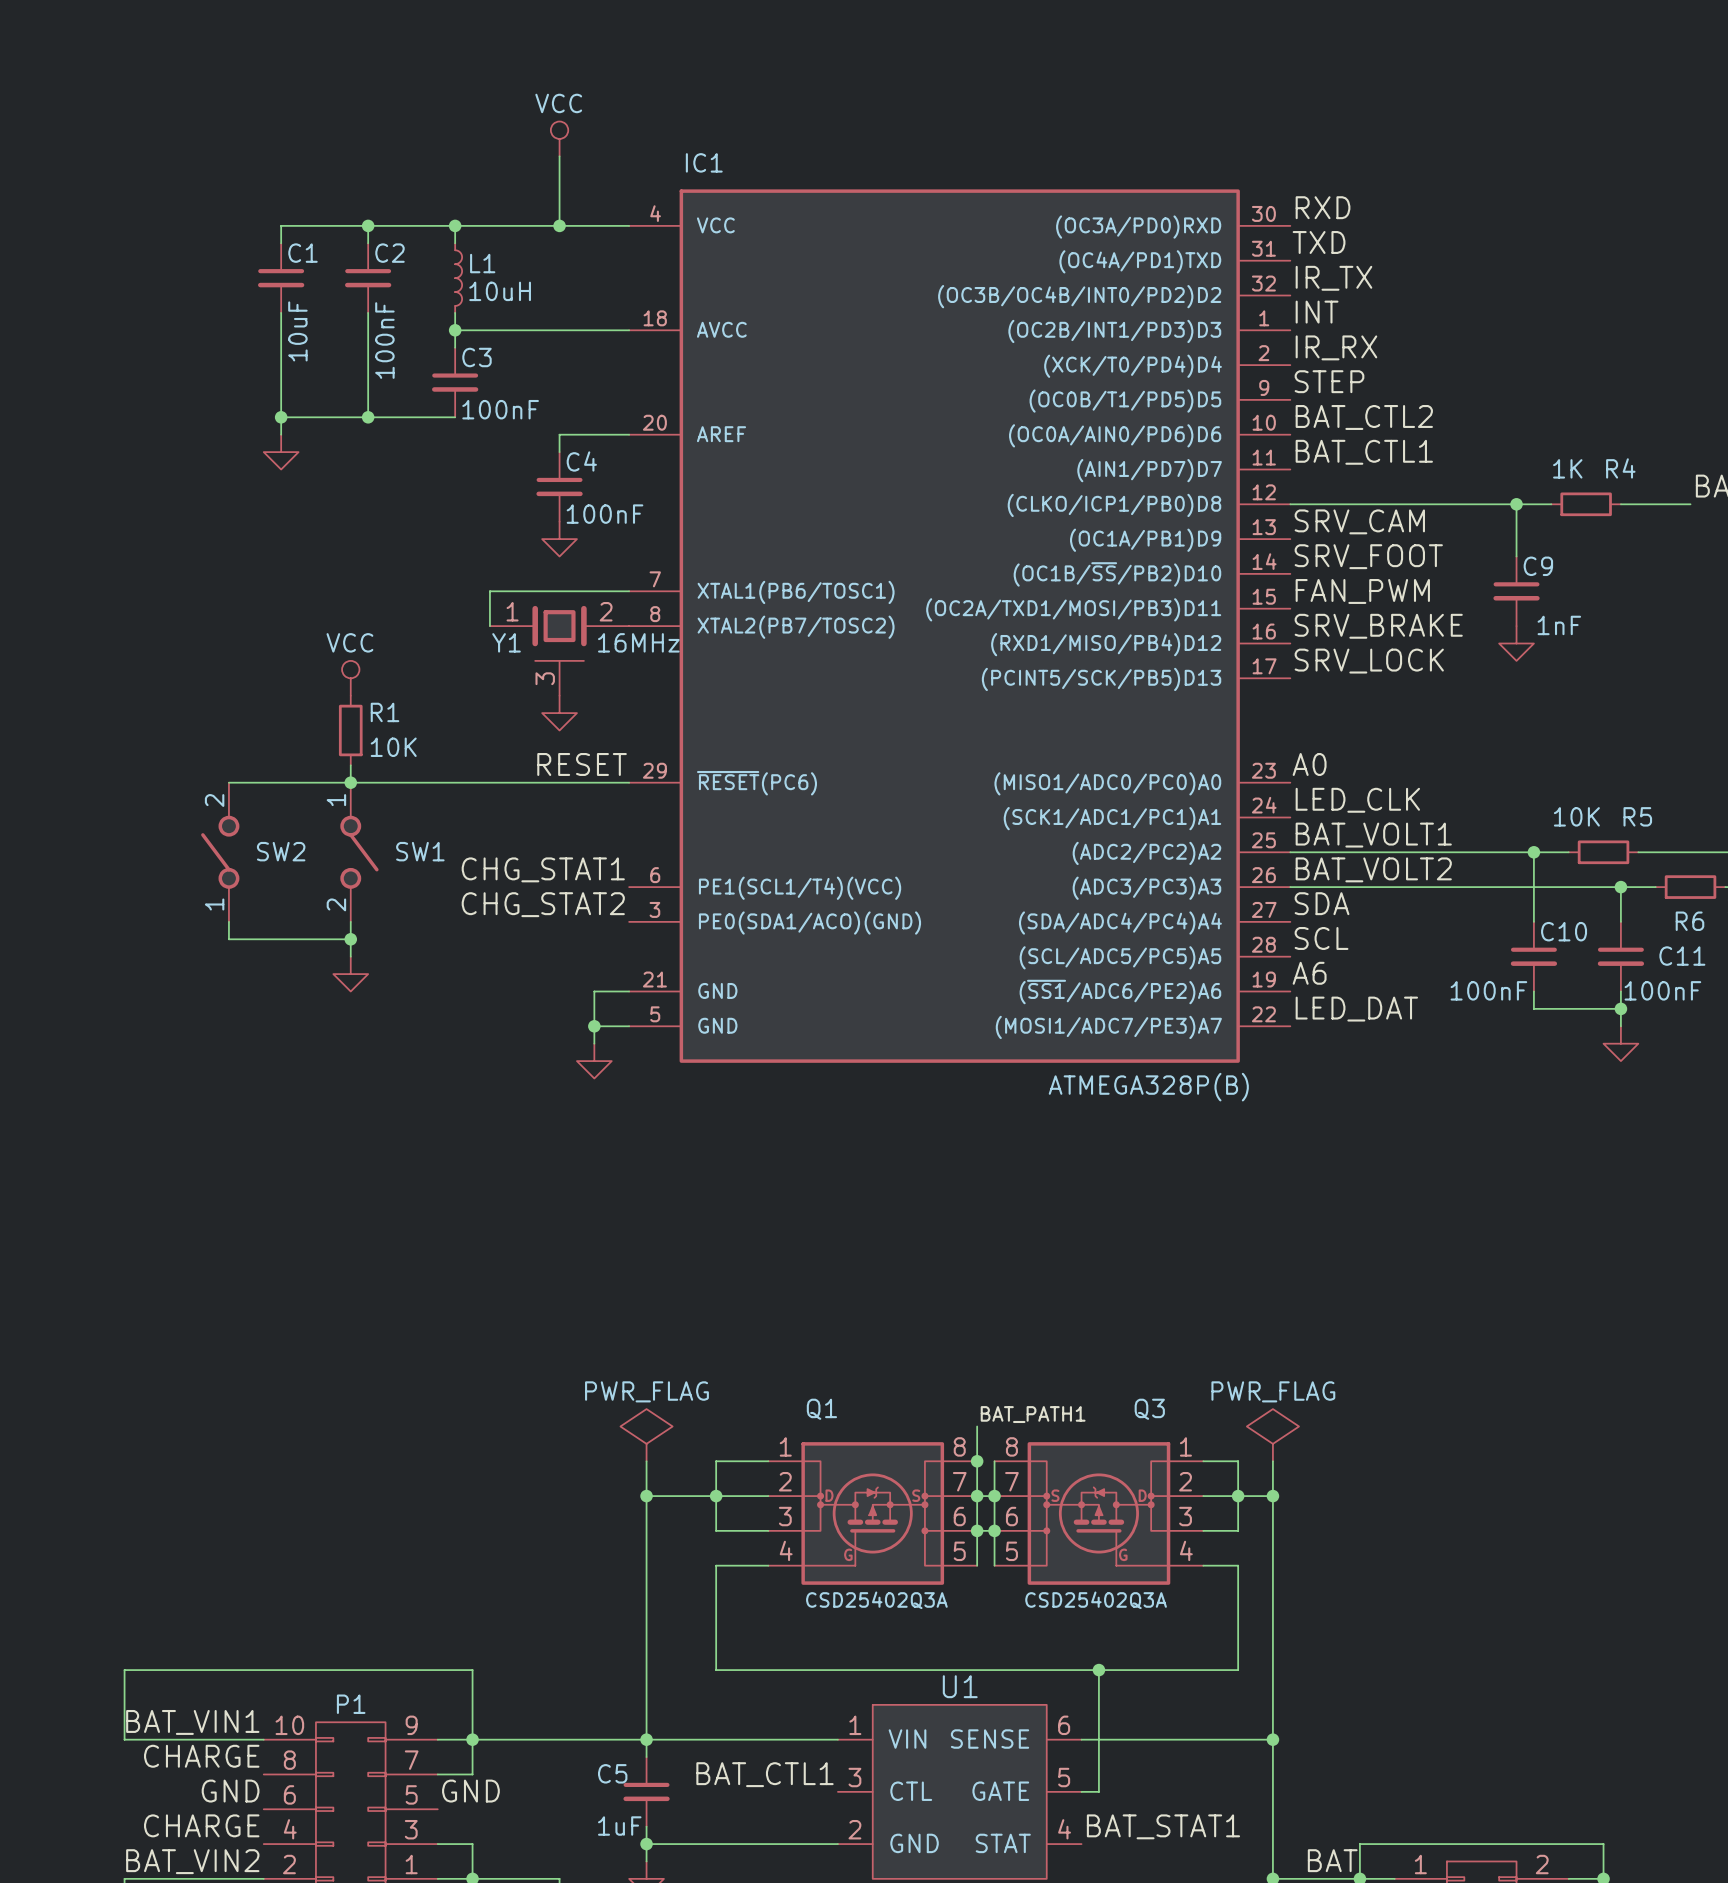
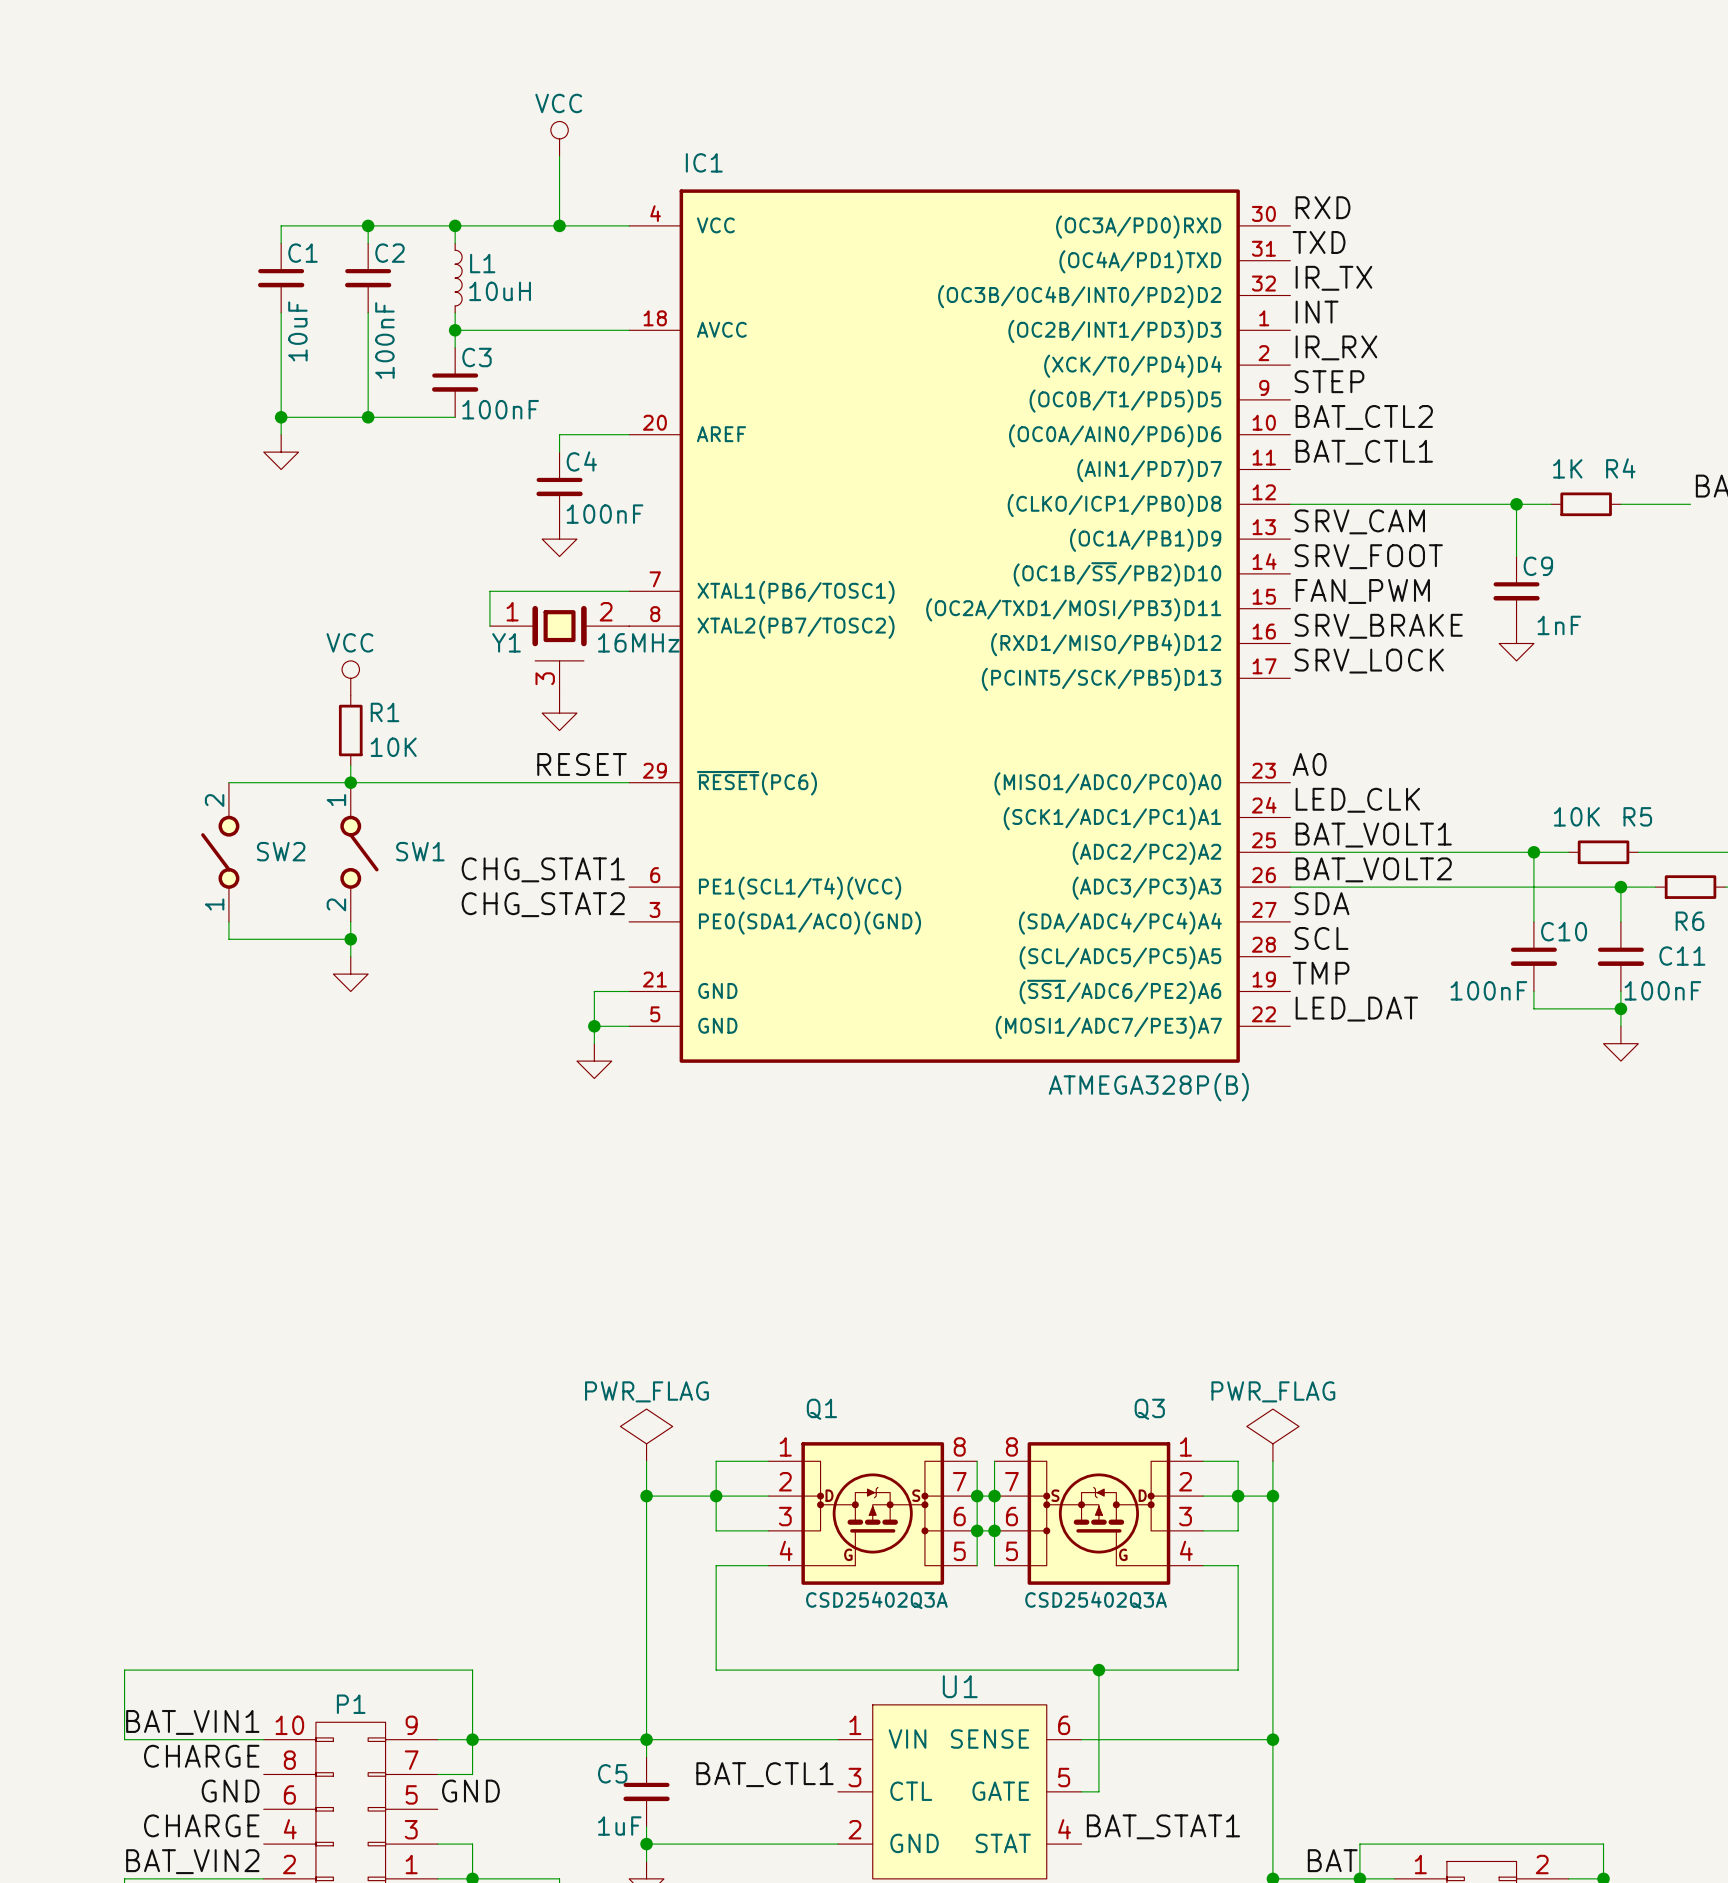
label: A6 (1309, 973) -> TMP (1321, 973)
label: BAT_PATH1 (1033, 1414) -> none
wire: (977, 1426) (977, 1461) -> none
junction: (977, 1461) -> none

